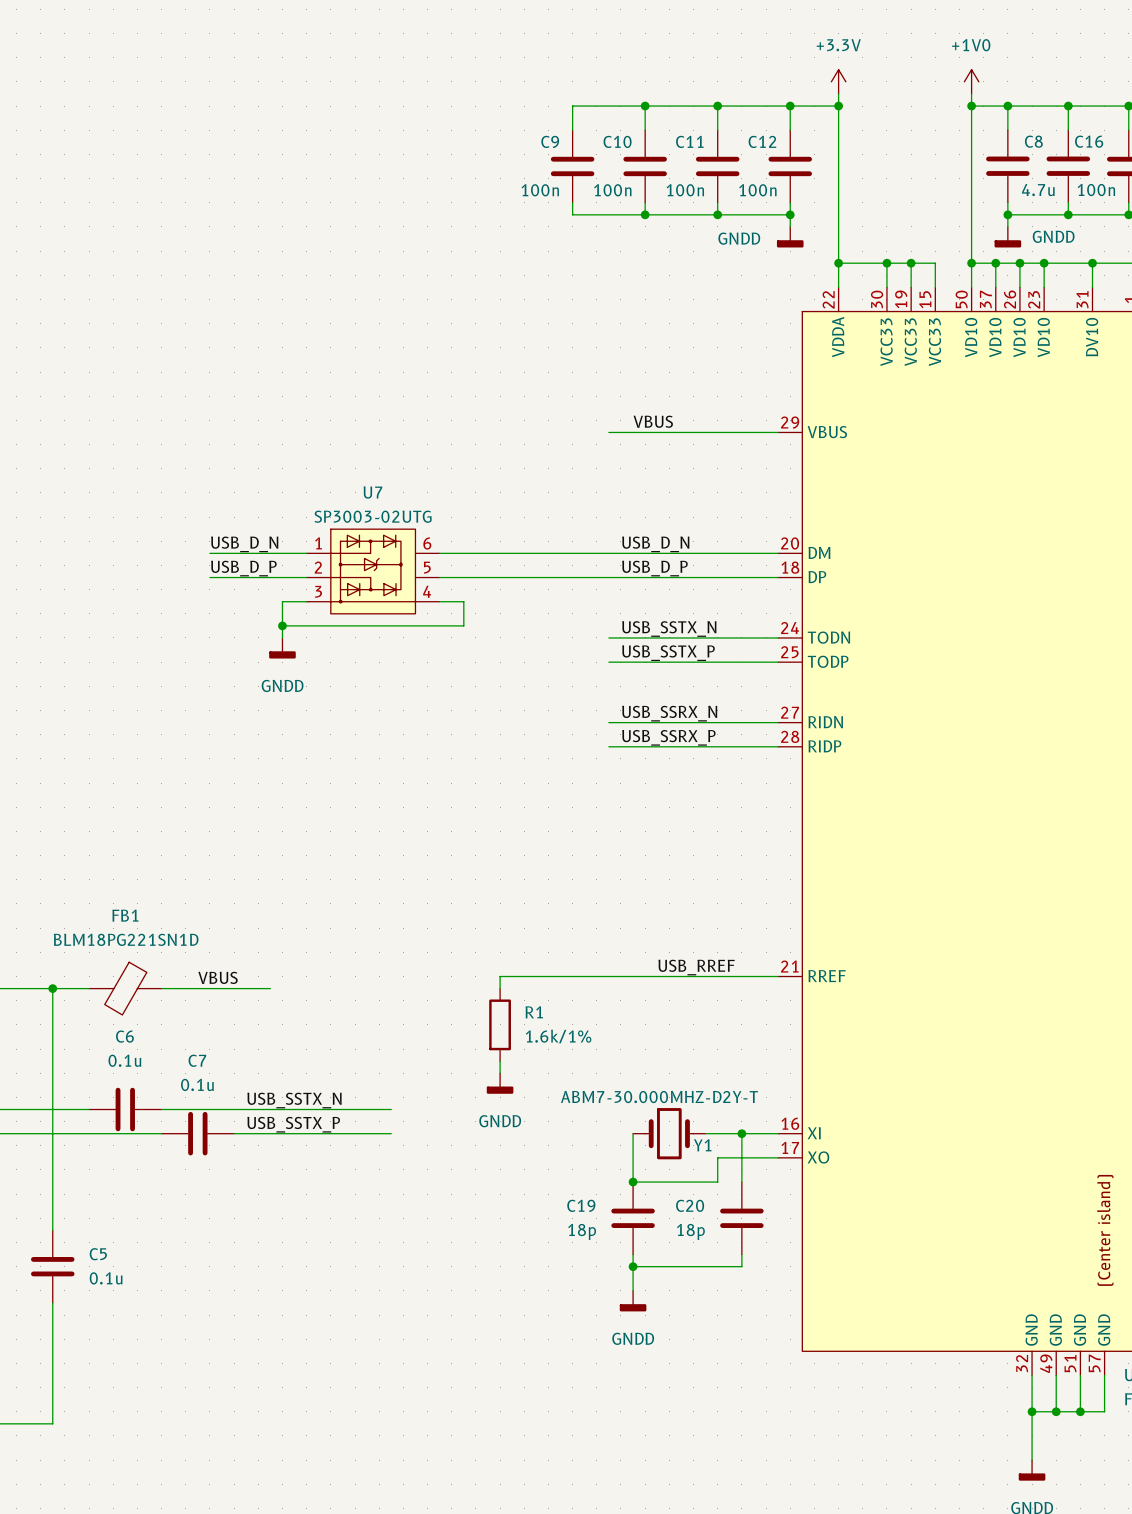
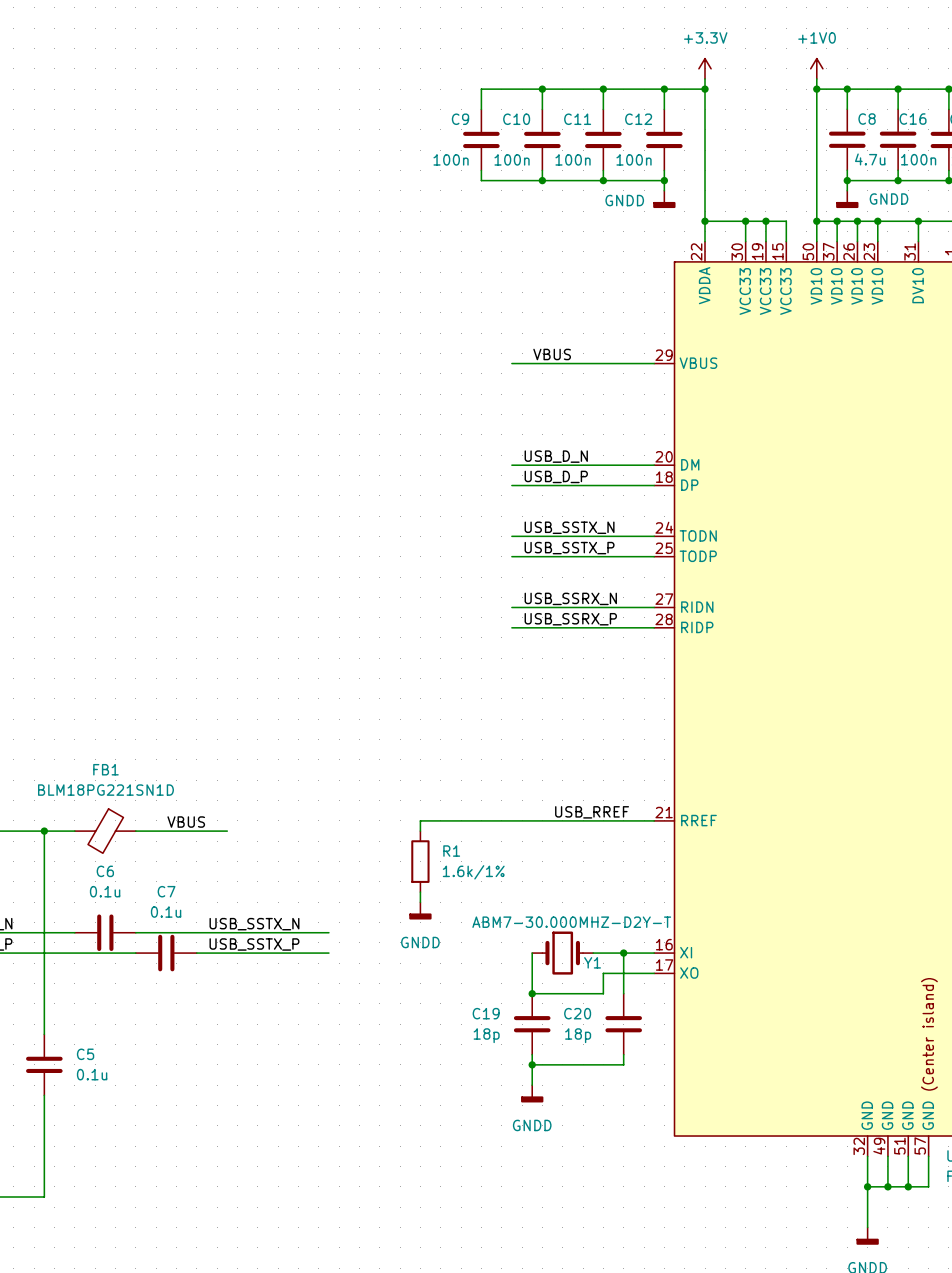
label: USB_D_N (244, 544) -> none
wire: (209, 553) (306, 553) -> none
wire: (439, 553) (608, 553) -> none
label: USB_D_P (243, 568) -> none
U7: SP3003-02UTG (373, 571) -> none
wire: (209, 577) (306, 577) -> none
wire: (439, 577) (608, 577) -> none
wire: (306, 601) (282, 601) (282, 637) -> none
wire: (439, 601) (463, 601) (463, 625) (282, 625) -> none
junction: (282, 625) -> none
power symbol: GNDD (282, 648) -> none

